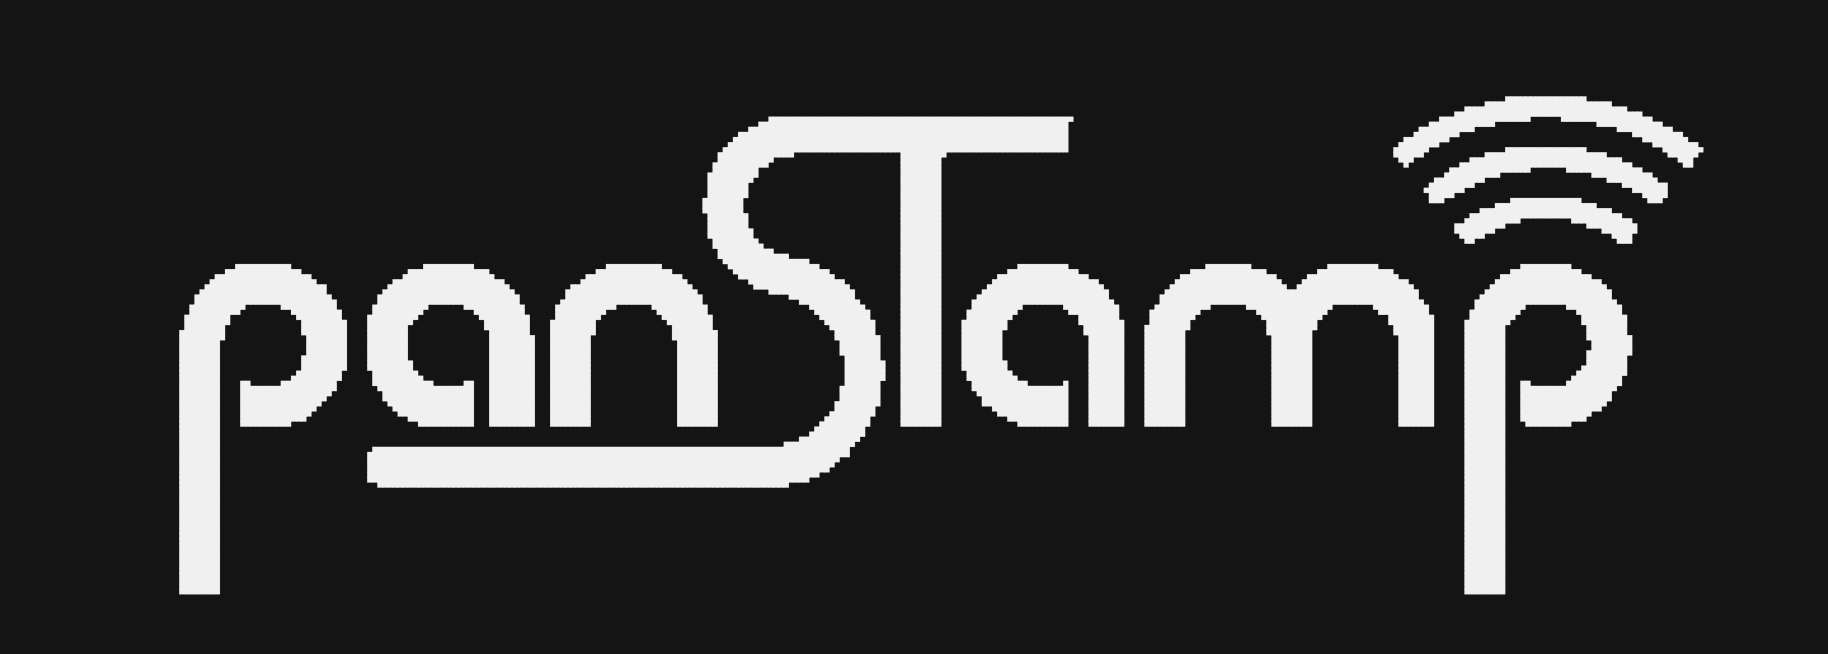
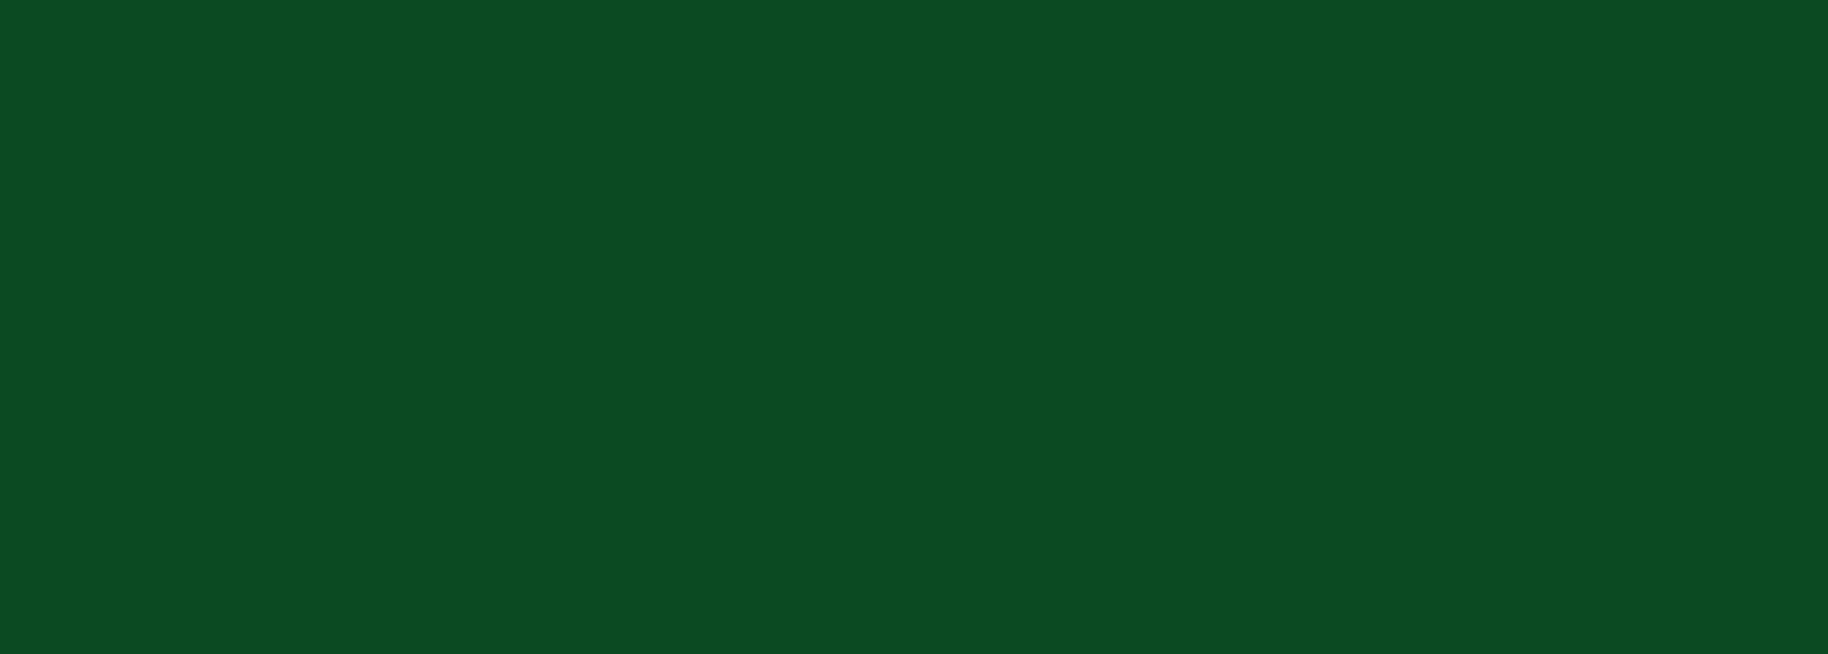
drawing: [179, 96, 1704, 595] -> none

